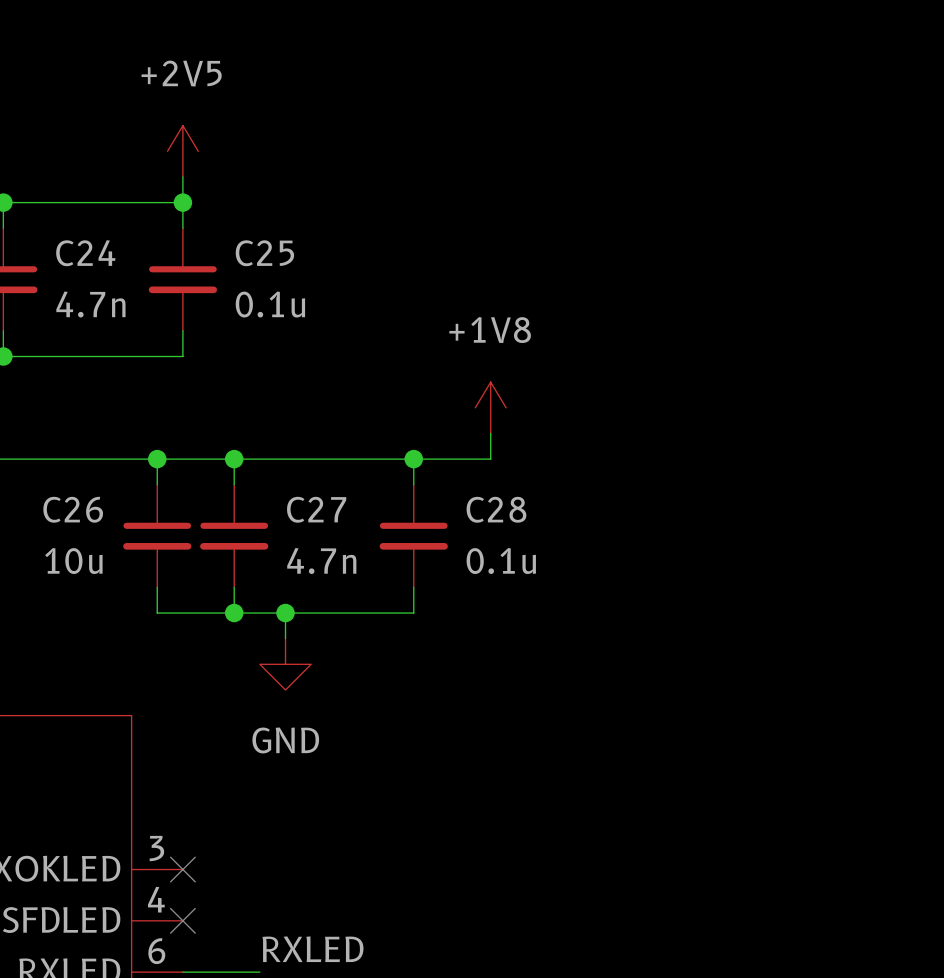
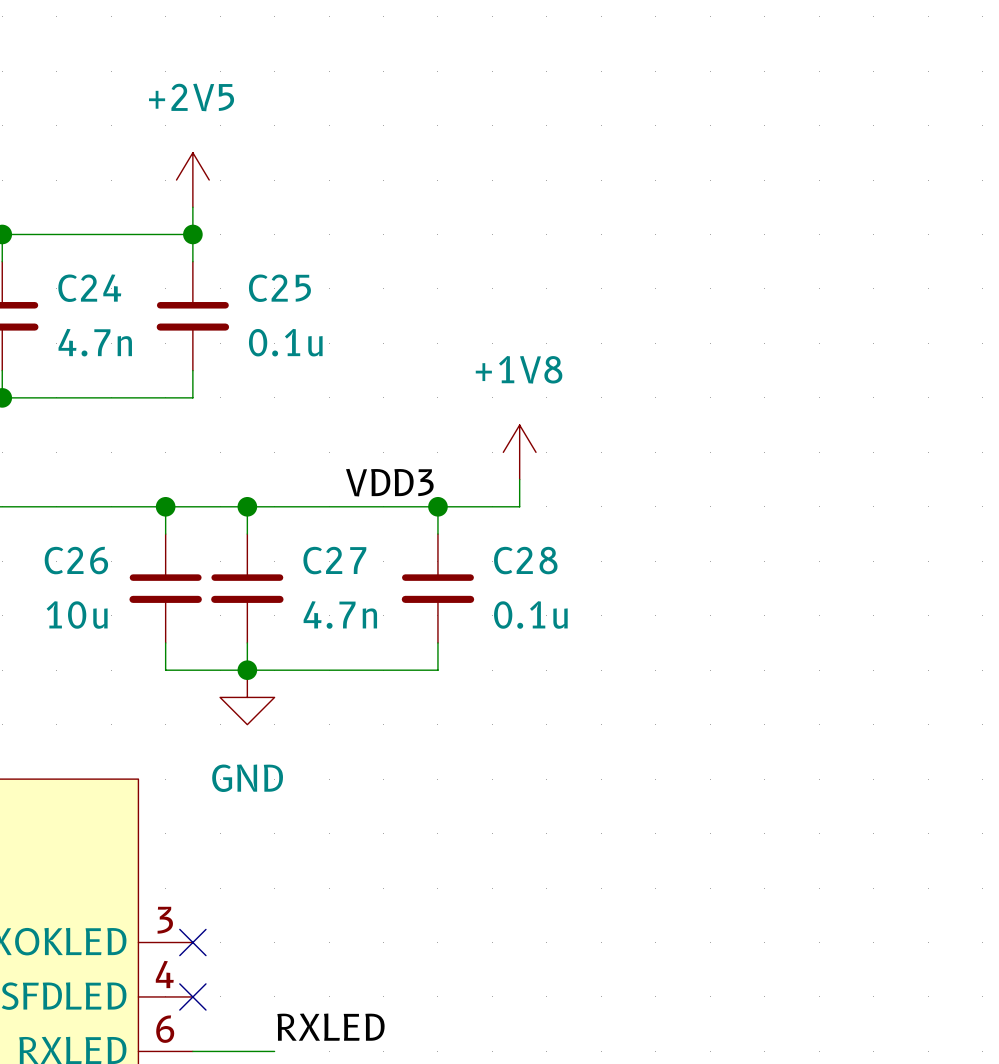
label: none -> VDD3 (389, 482)
wire: (285, 613) (285, 638) -> none
junction: (285, 613) -> none
power symbol position: GND (285, 664) -> GND (247, 697)

